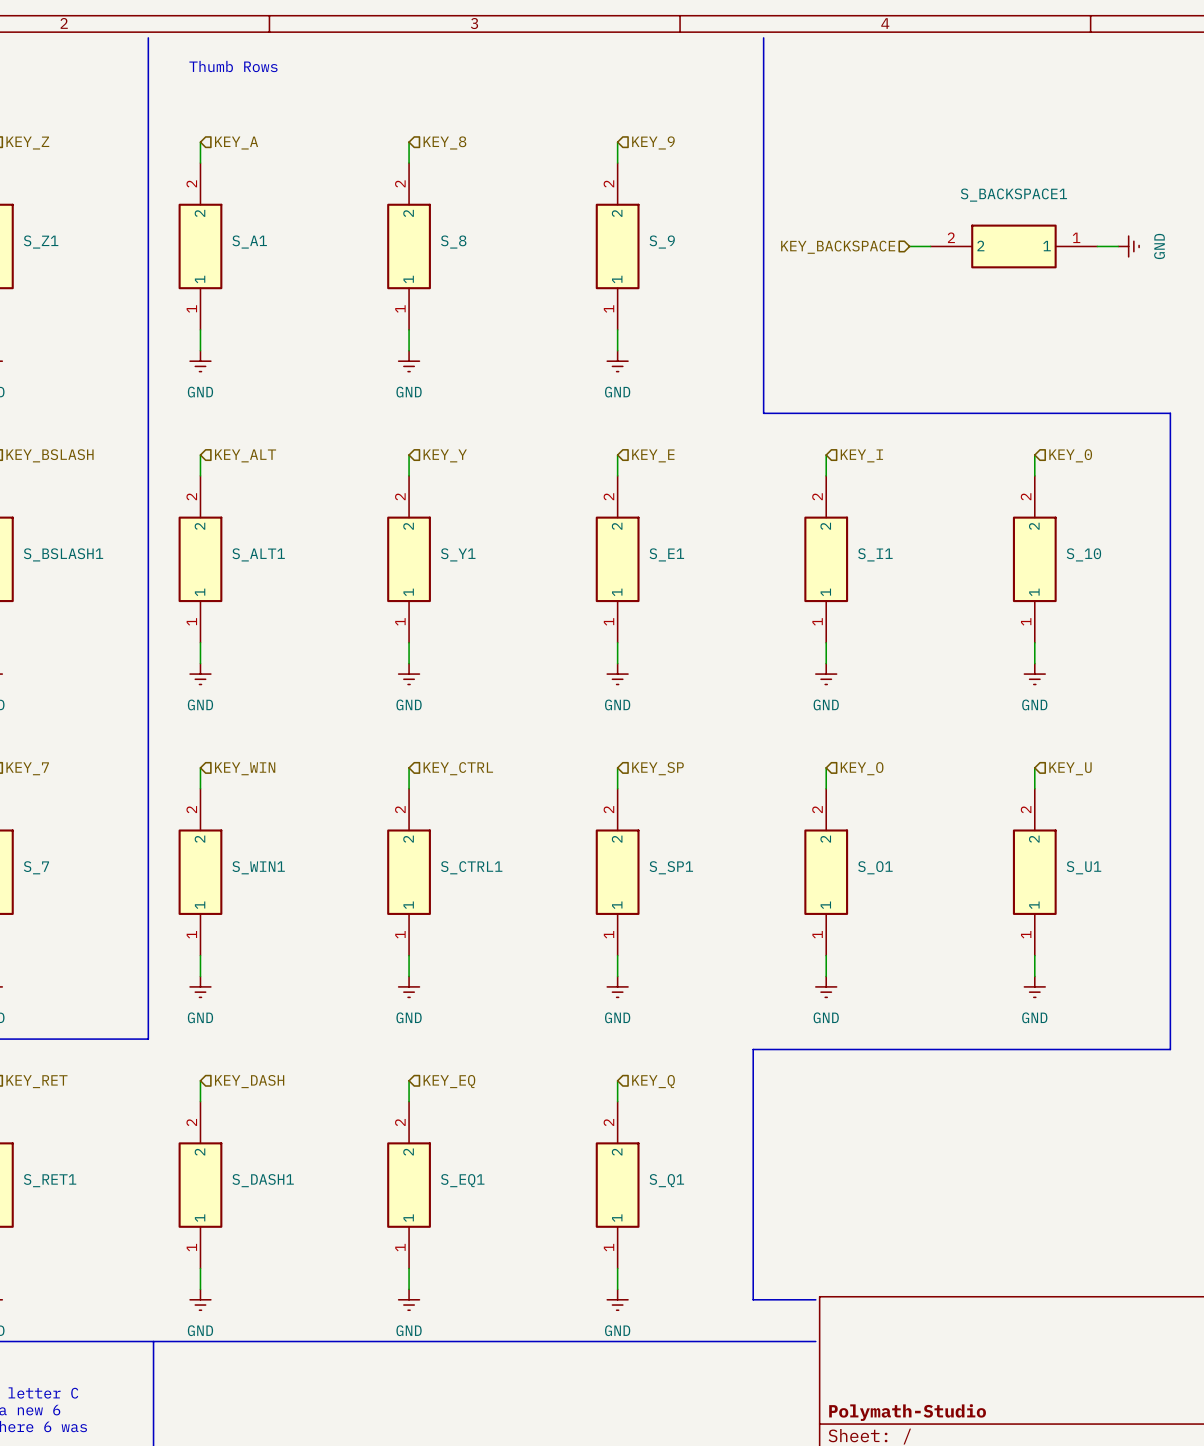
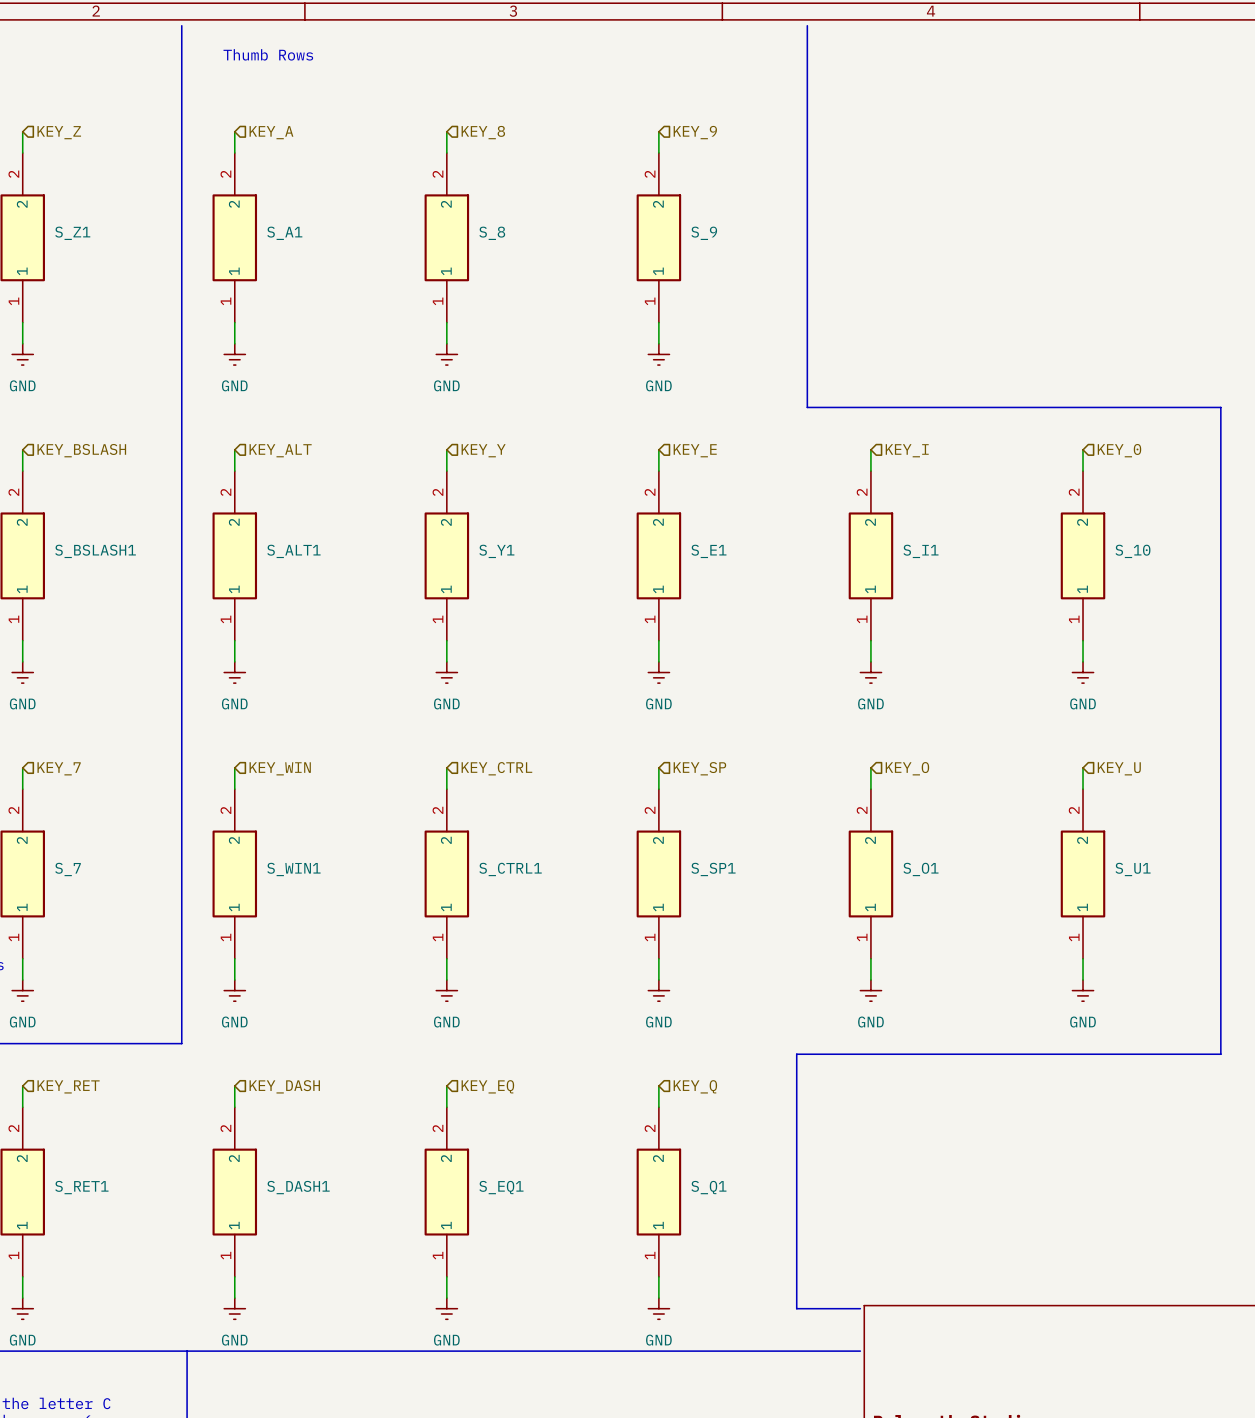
wire: (909, 246) (930, 246) -> none
S_BACKSPACE1: (1013, 246) -> none
wire: (1097, 246) (1118, 246) -> none
power symbol: GND (1128, 246) -> none
hierarchical label: KEY_BACKSPACE (838, 247) -> none

